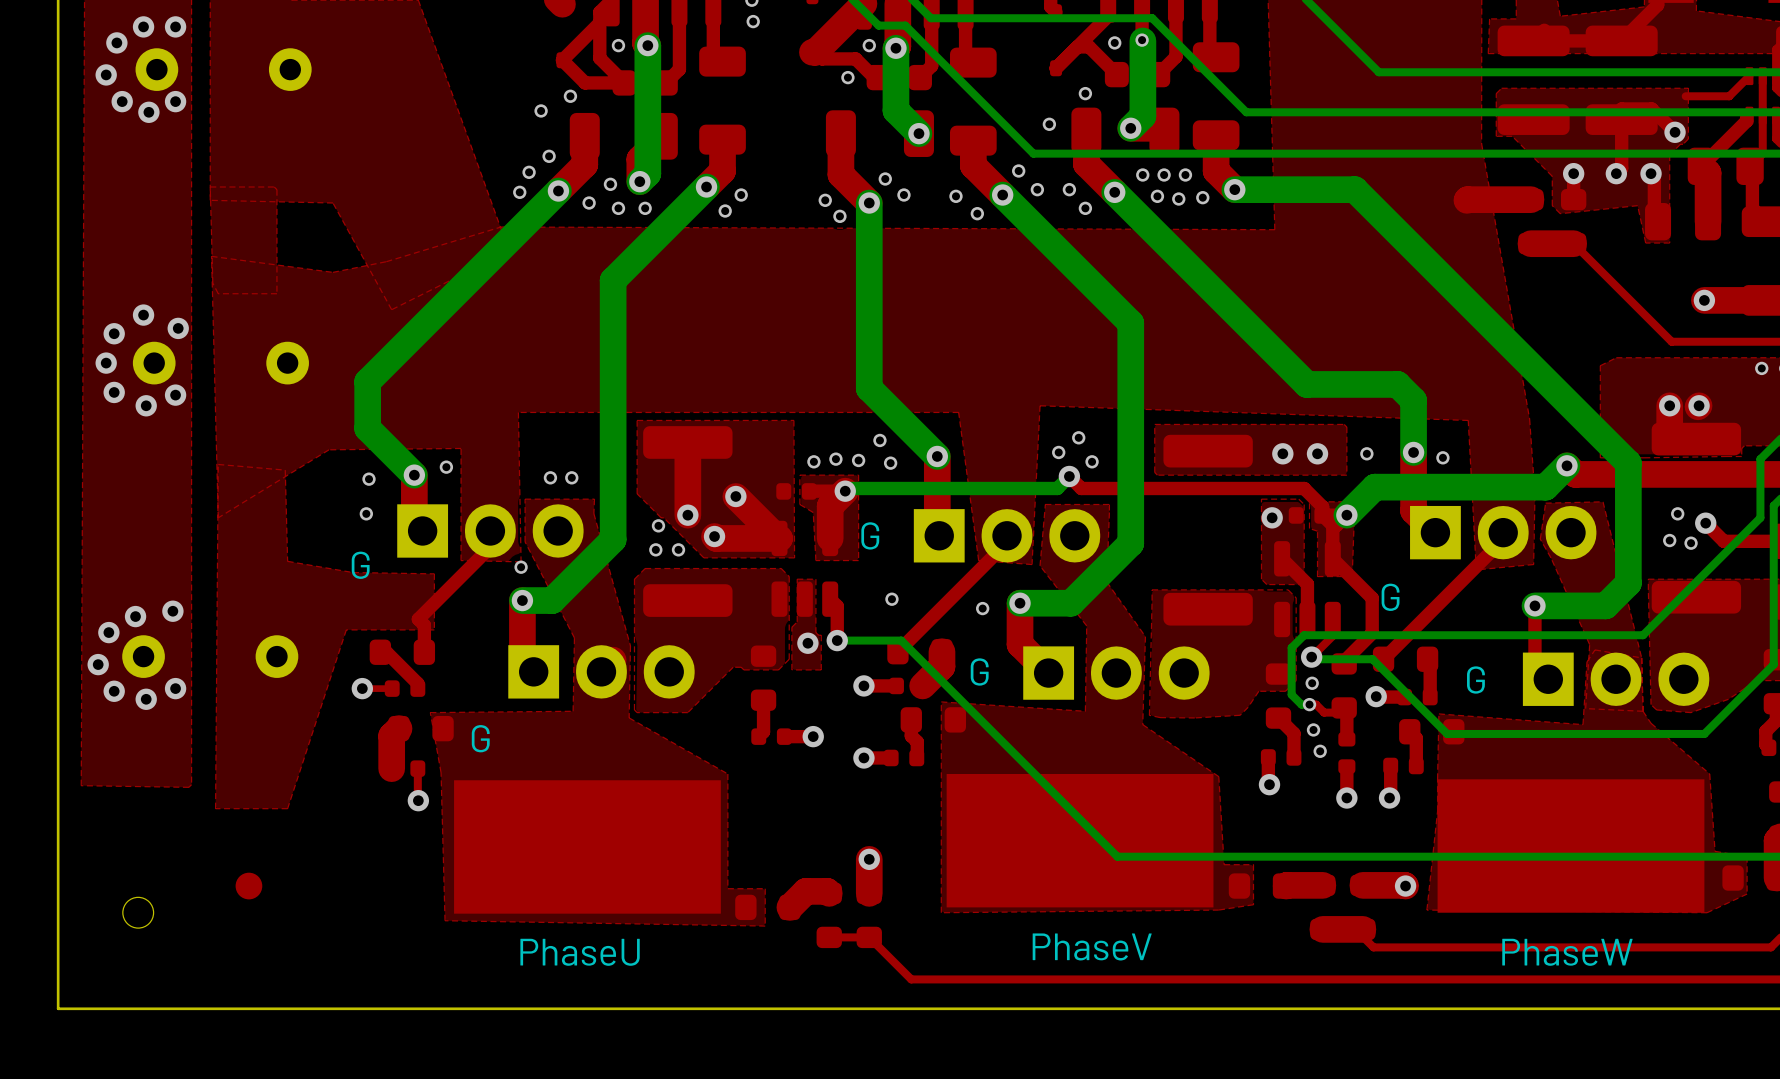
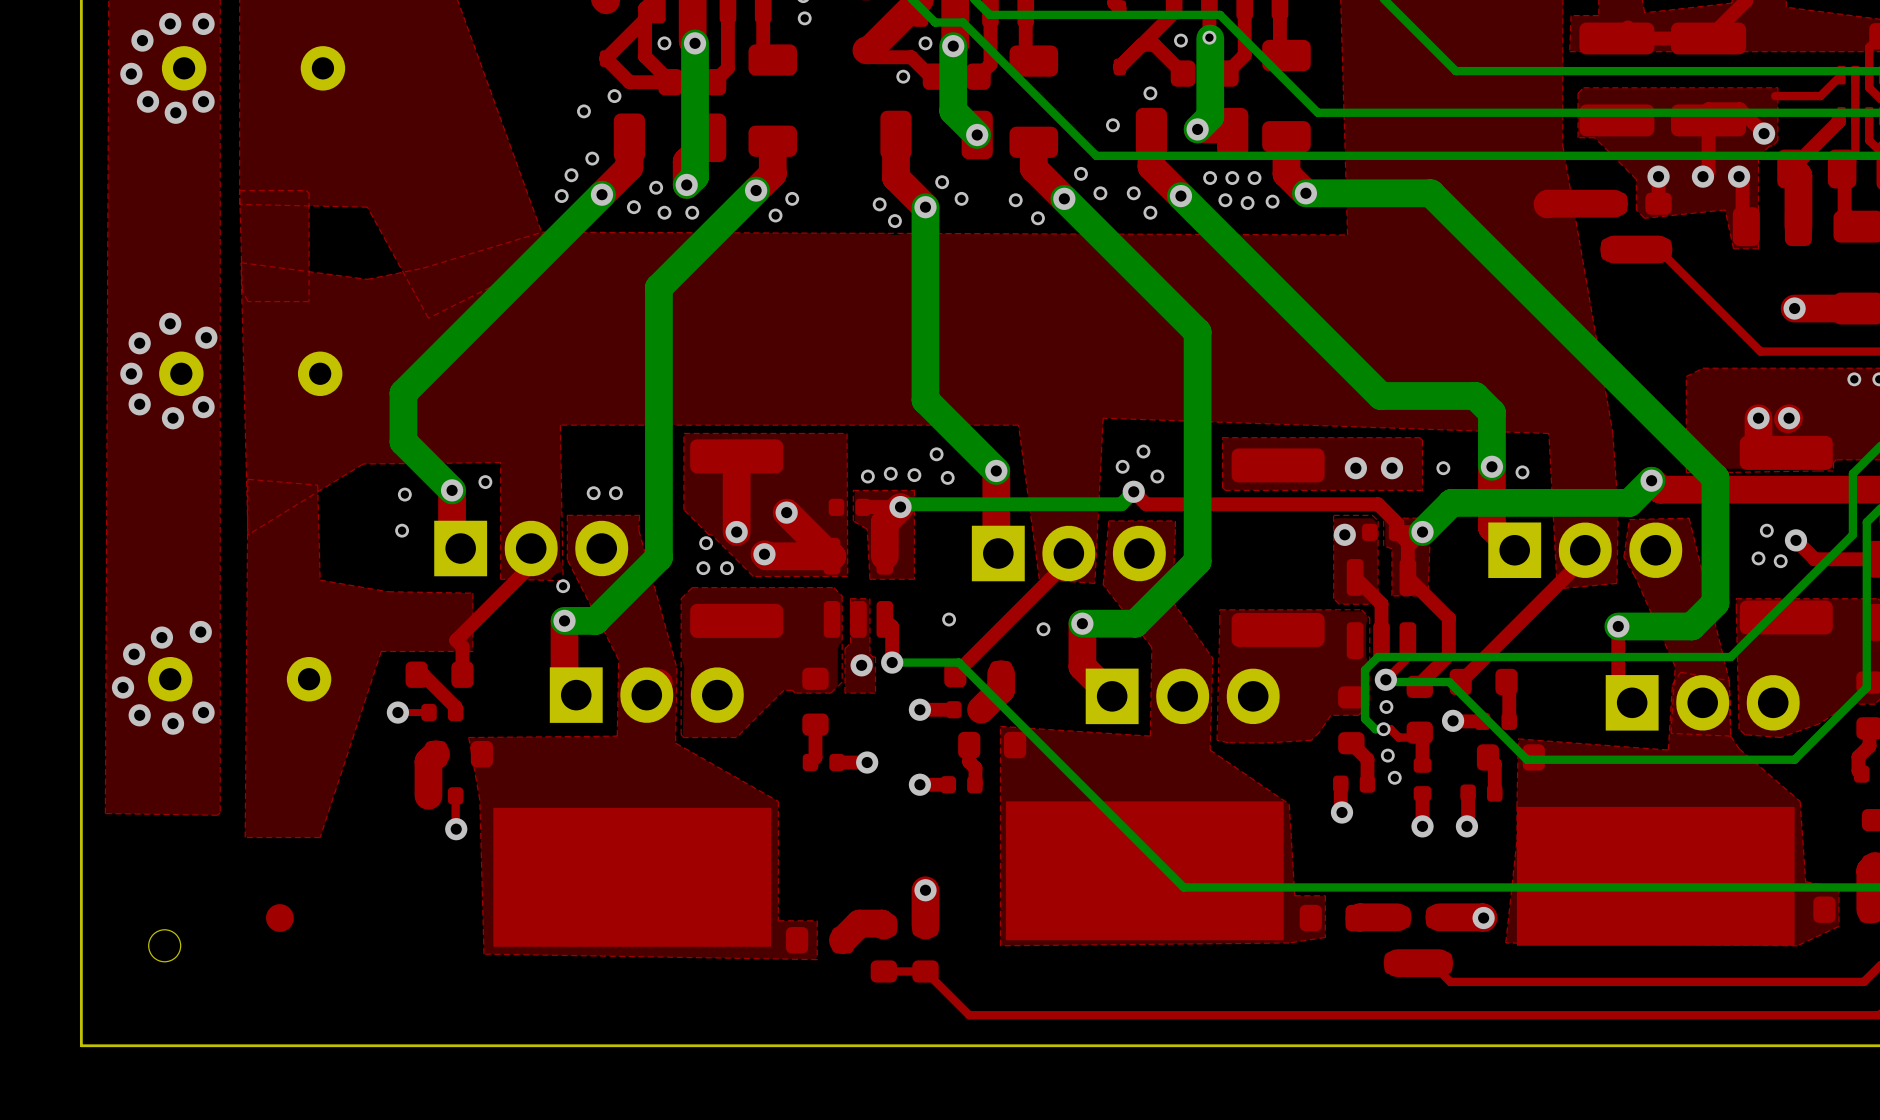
text: G (870, 535) -> none
text: G (360, 565) -> none
text: G (1390, 597) -> none
text: G (979, 672) -> none
text: G (1475, 680) -> none
text: G (480, 738) -> none
text: PhaseV (1092, 946) -> none
text: PhaseU (580, 952) -> none
text: PhaseW (1567, 952) -> none

